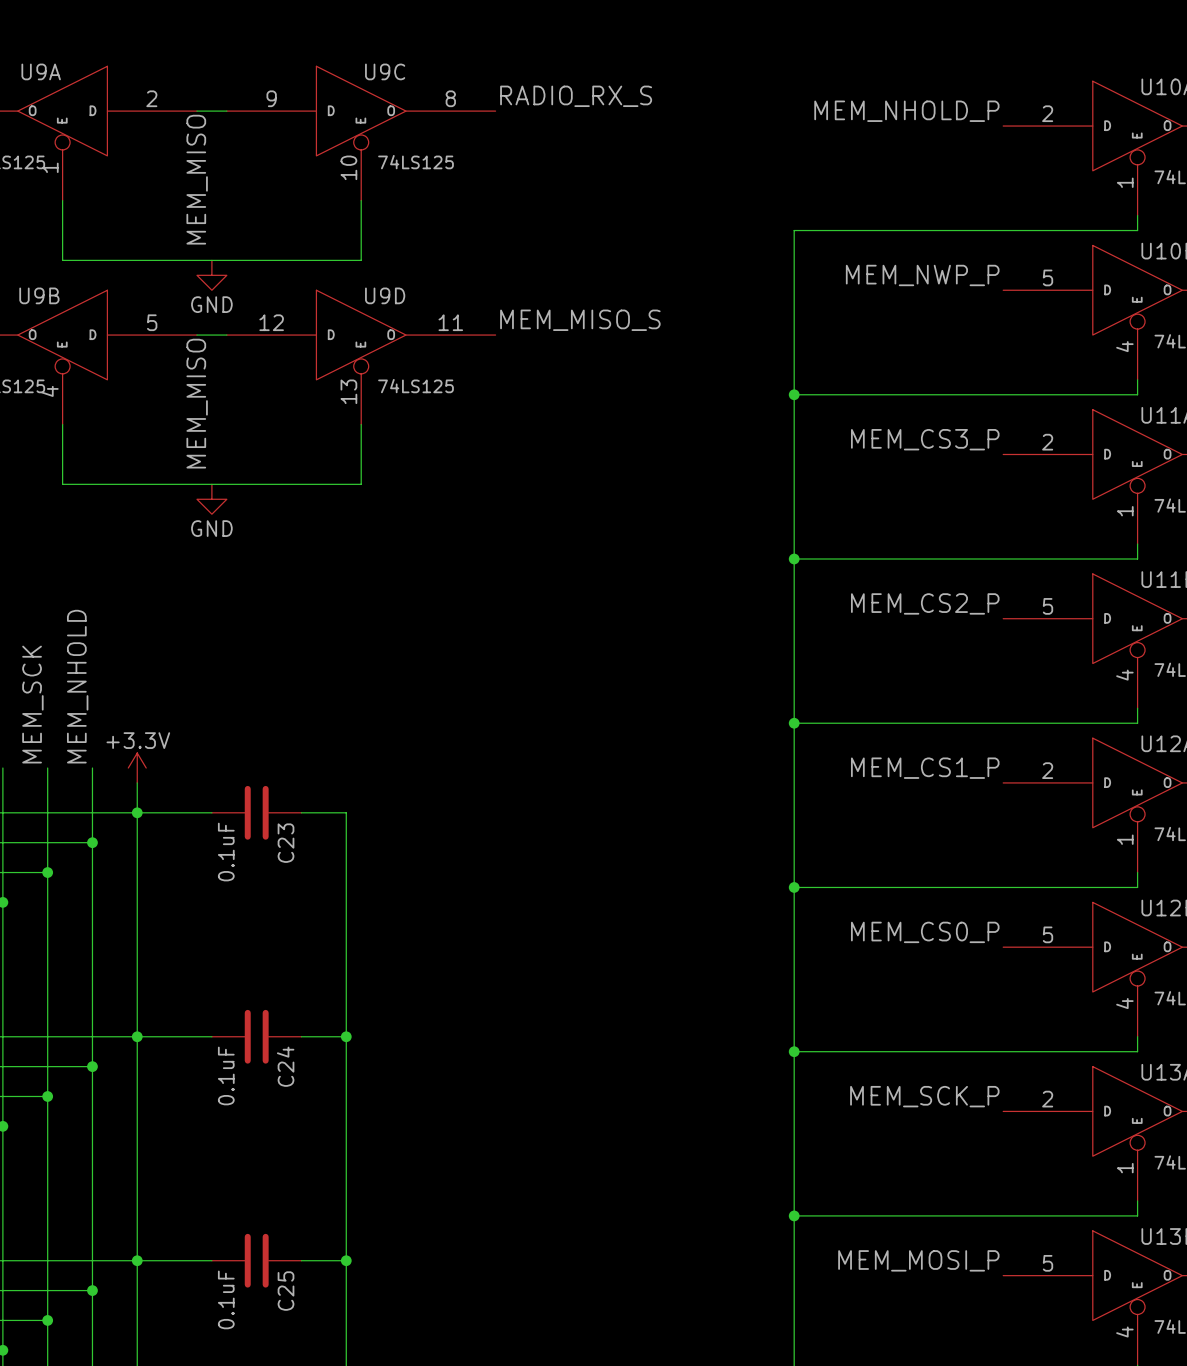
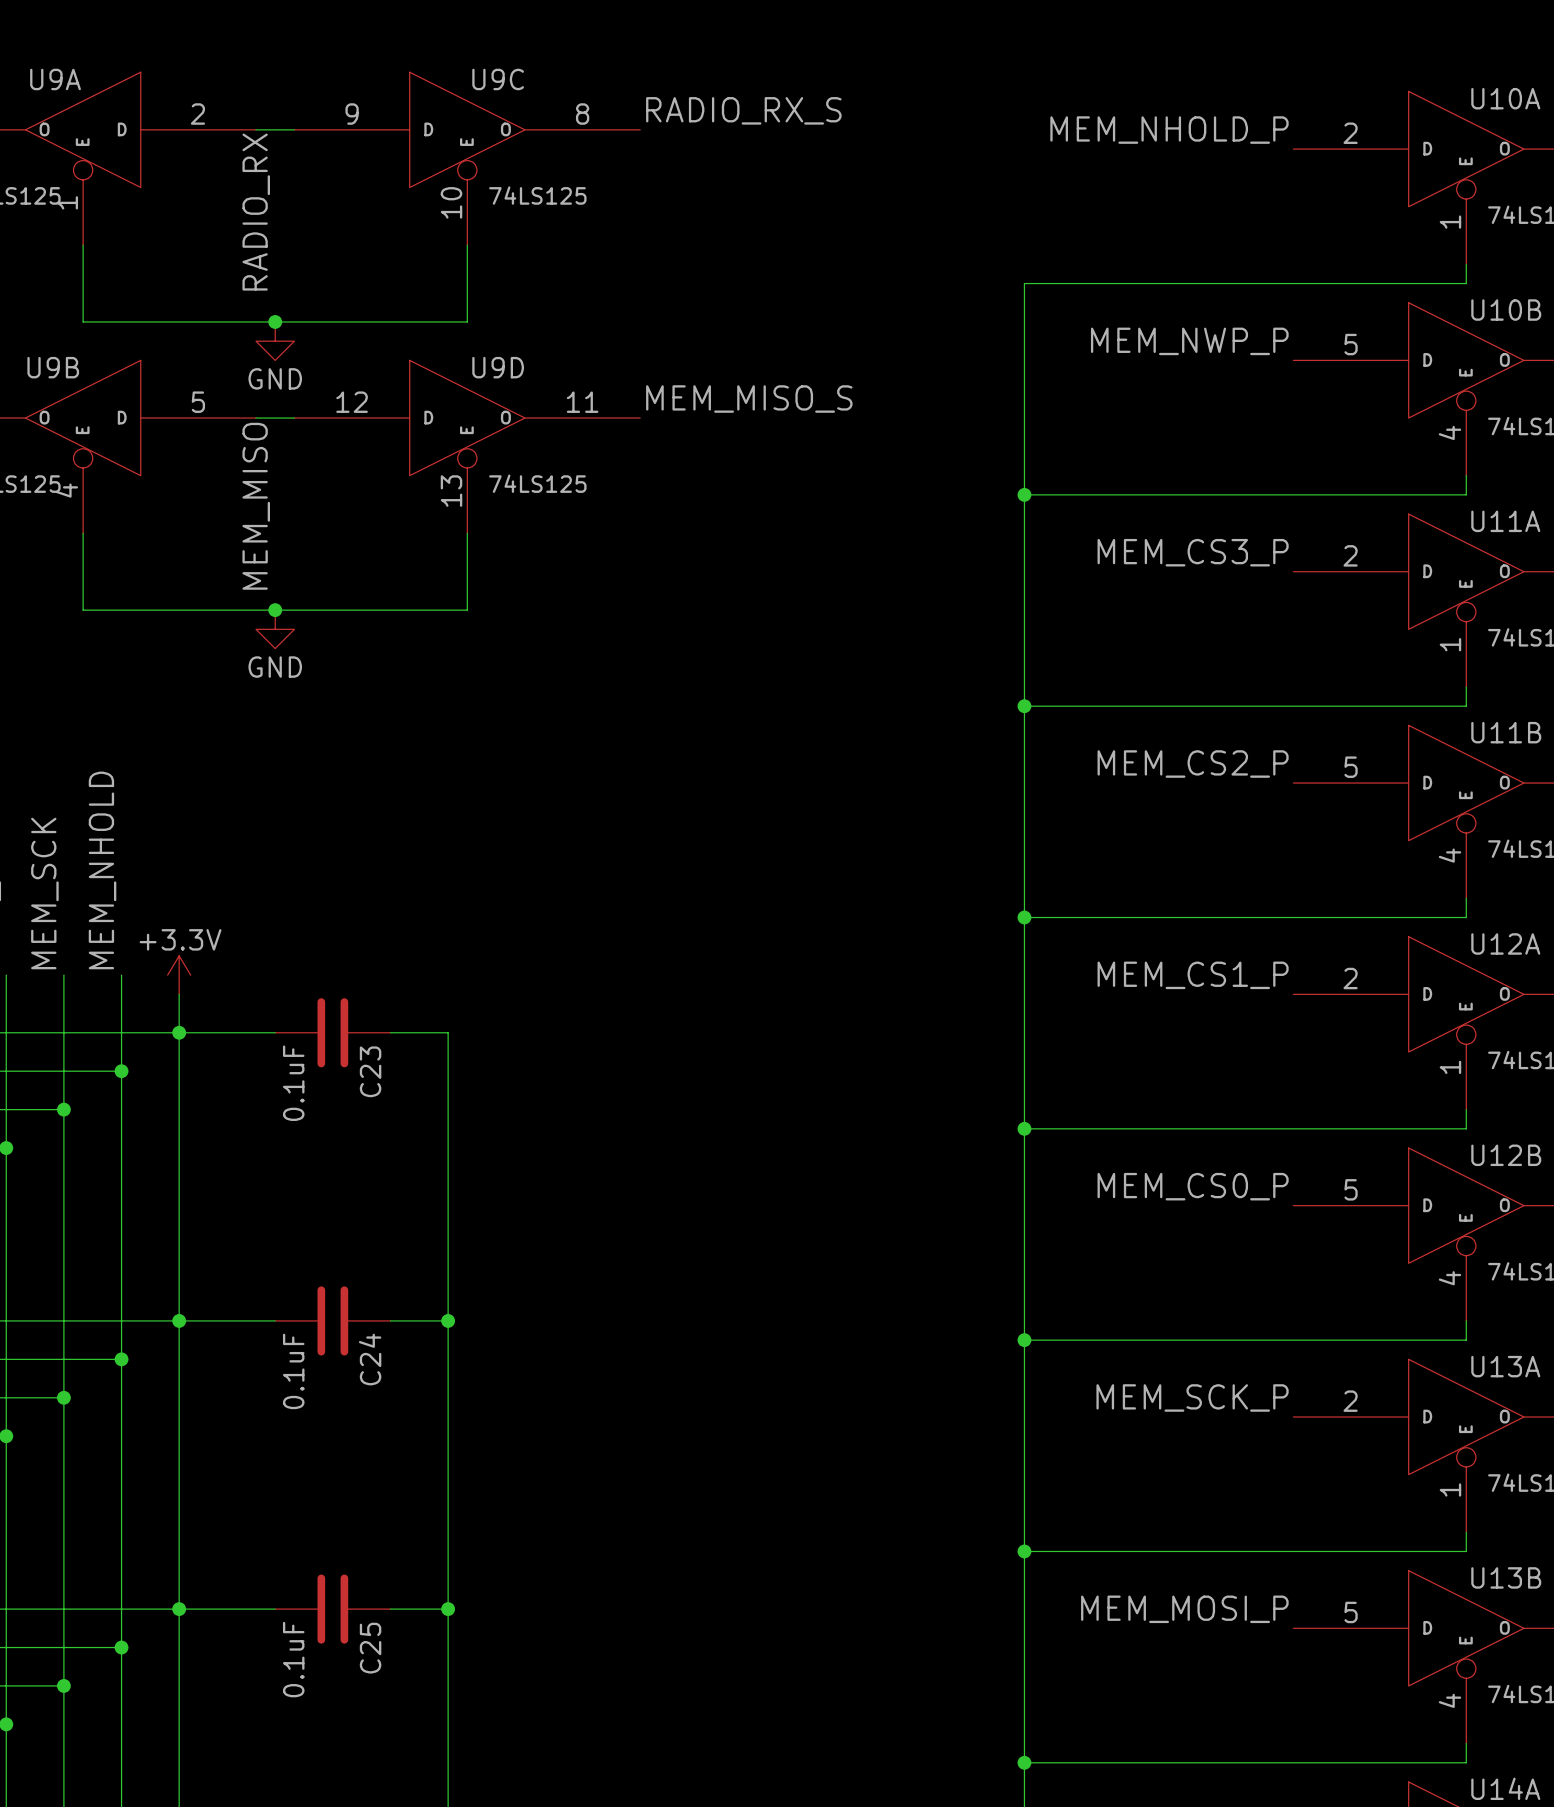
label: MEM_MISO (197, 179) -> RADIO_RX (256, 212)
junction: none -> (275, 321)
junction: none -> (275, 610)

